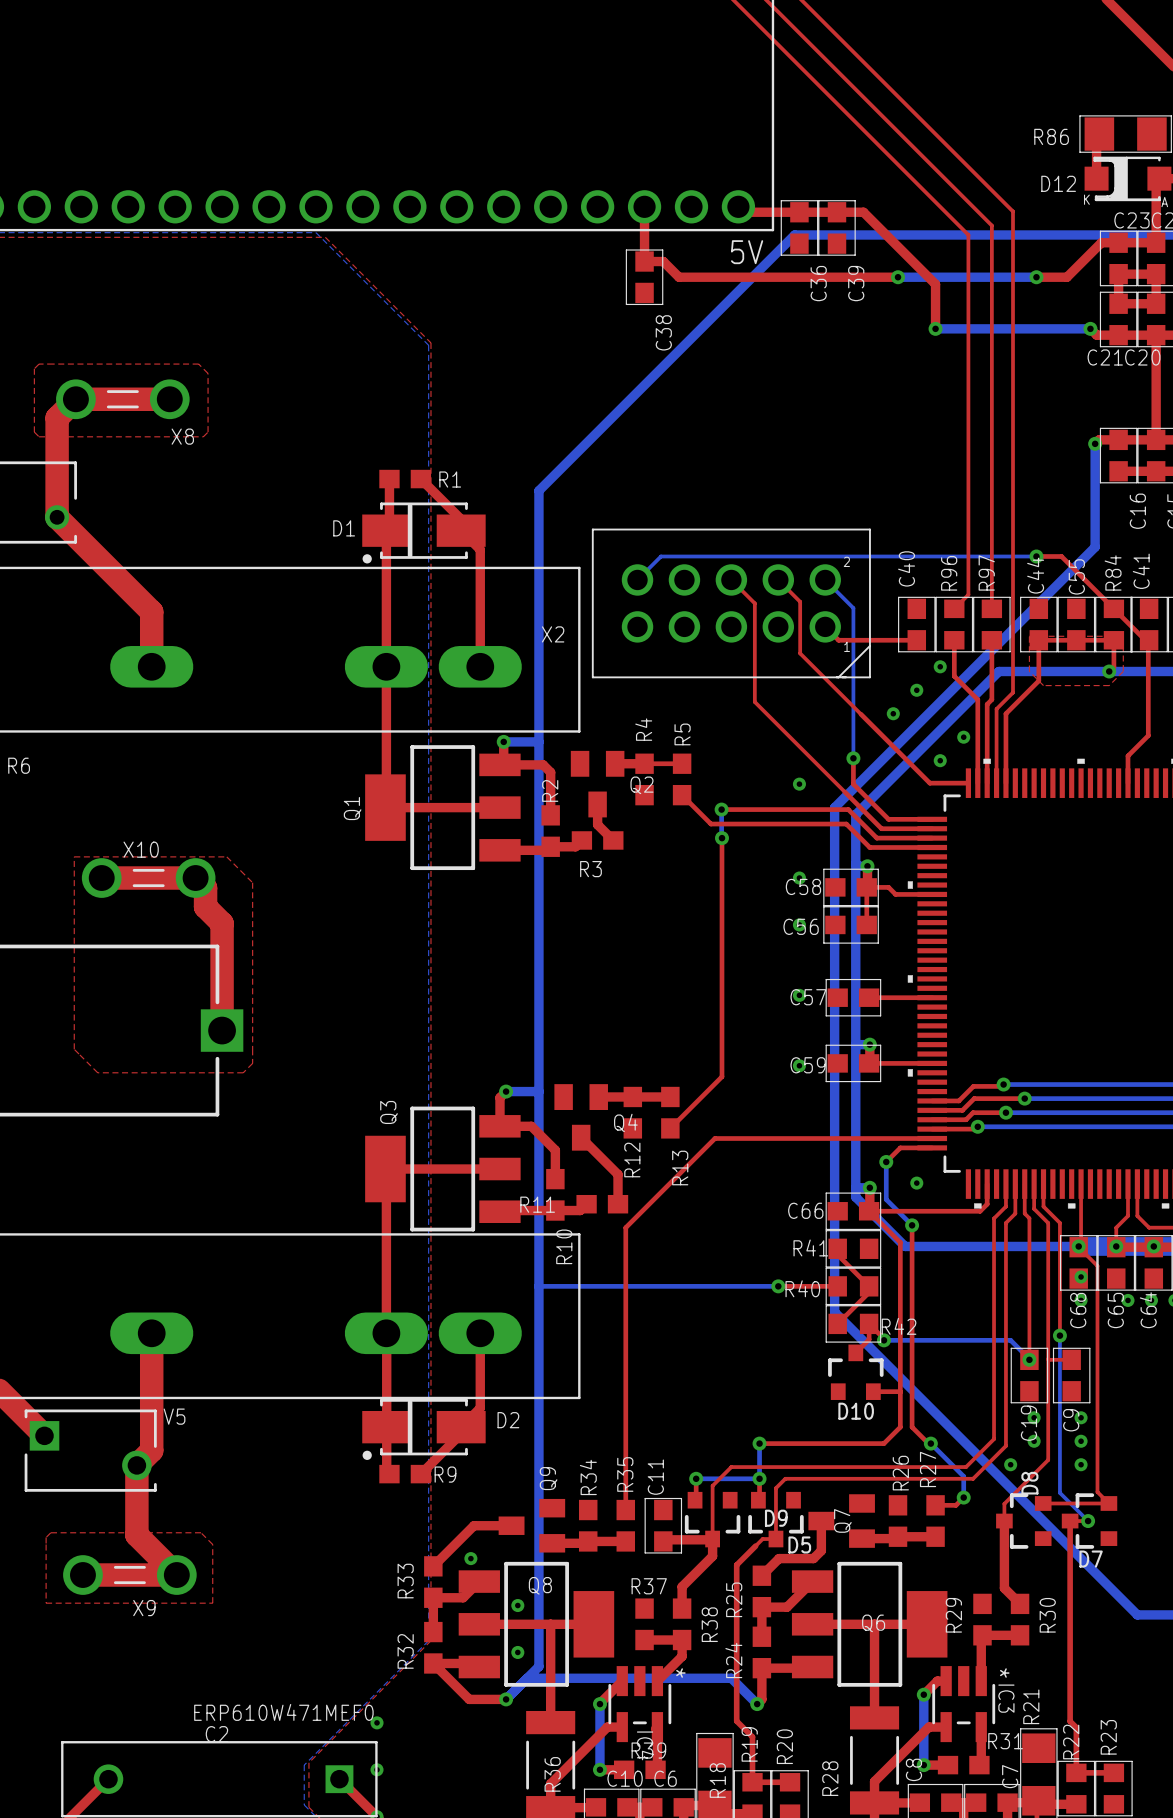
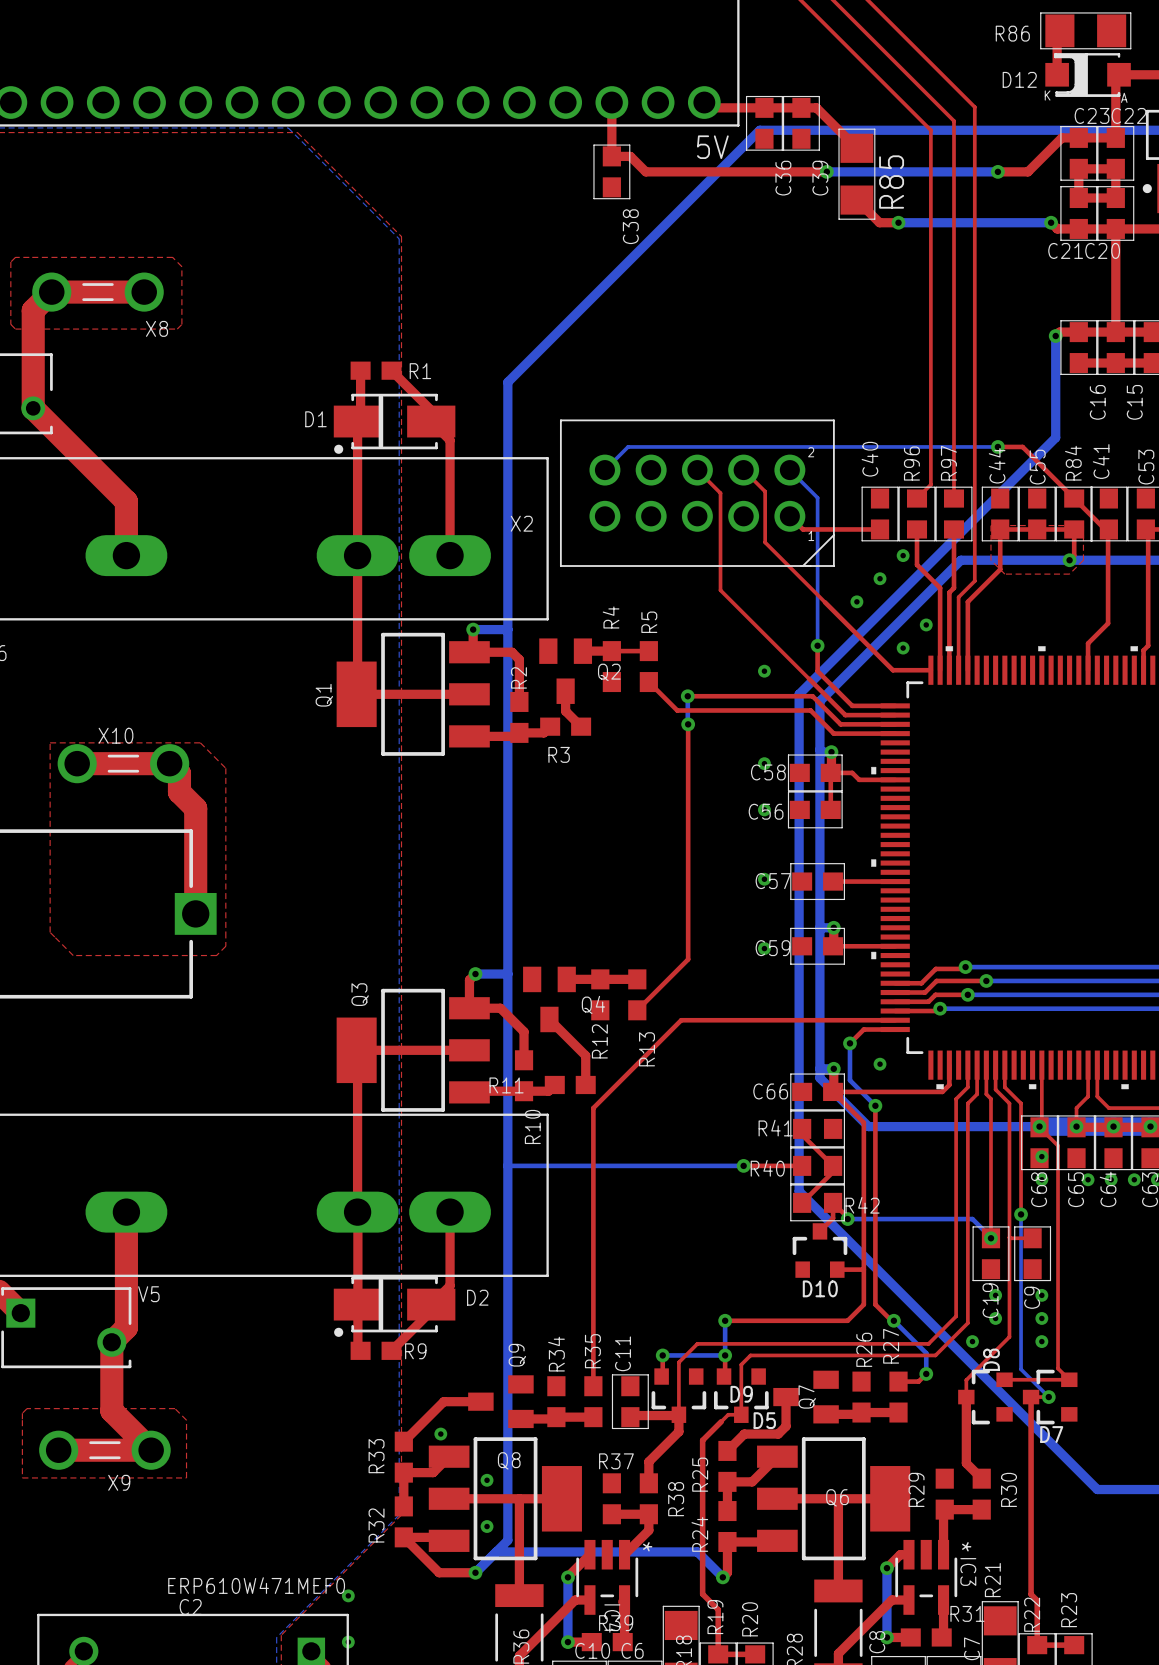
top track: (852, 212) (863, 212) (935, 284) (935, 328) -> (816, 107) (856, 148)
top track: (862, 277) (898, 277) -> none
bottom track: none -> (826, 171) (861, 171)
via position: (898, 277) -> (826, 171)
R85: none -> (856, 174)
top track: none -> (856, 200) (879, 222) (898, 222)

